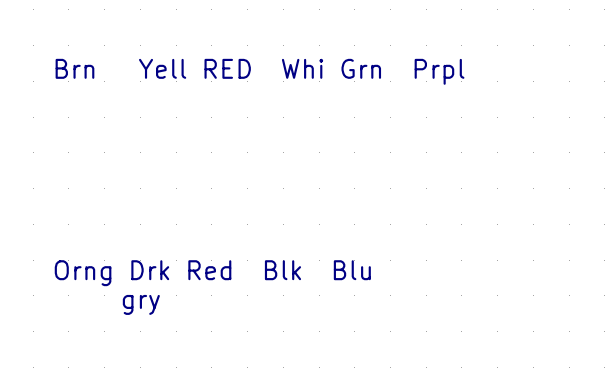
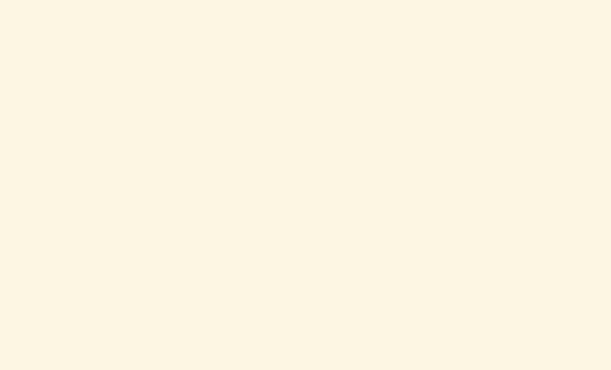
text: Brn Yell RED Whi Grn Prpl (260, 71) -> none
text: Orng Drk Red Blk Blu (212, 273) -> none
text: gry (141, 304) -> none

